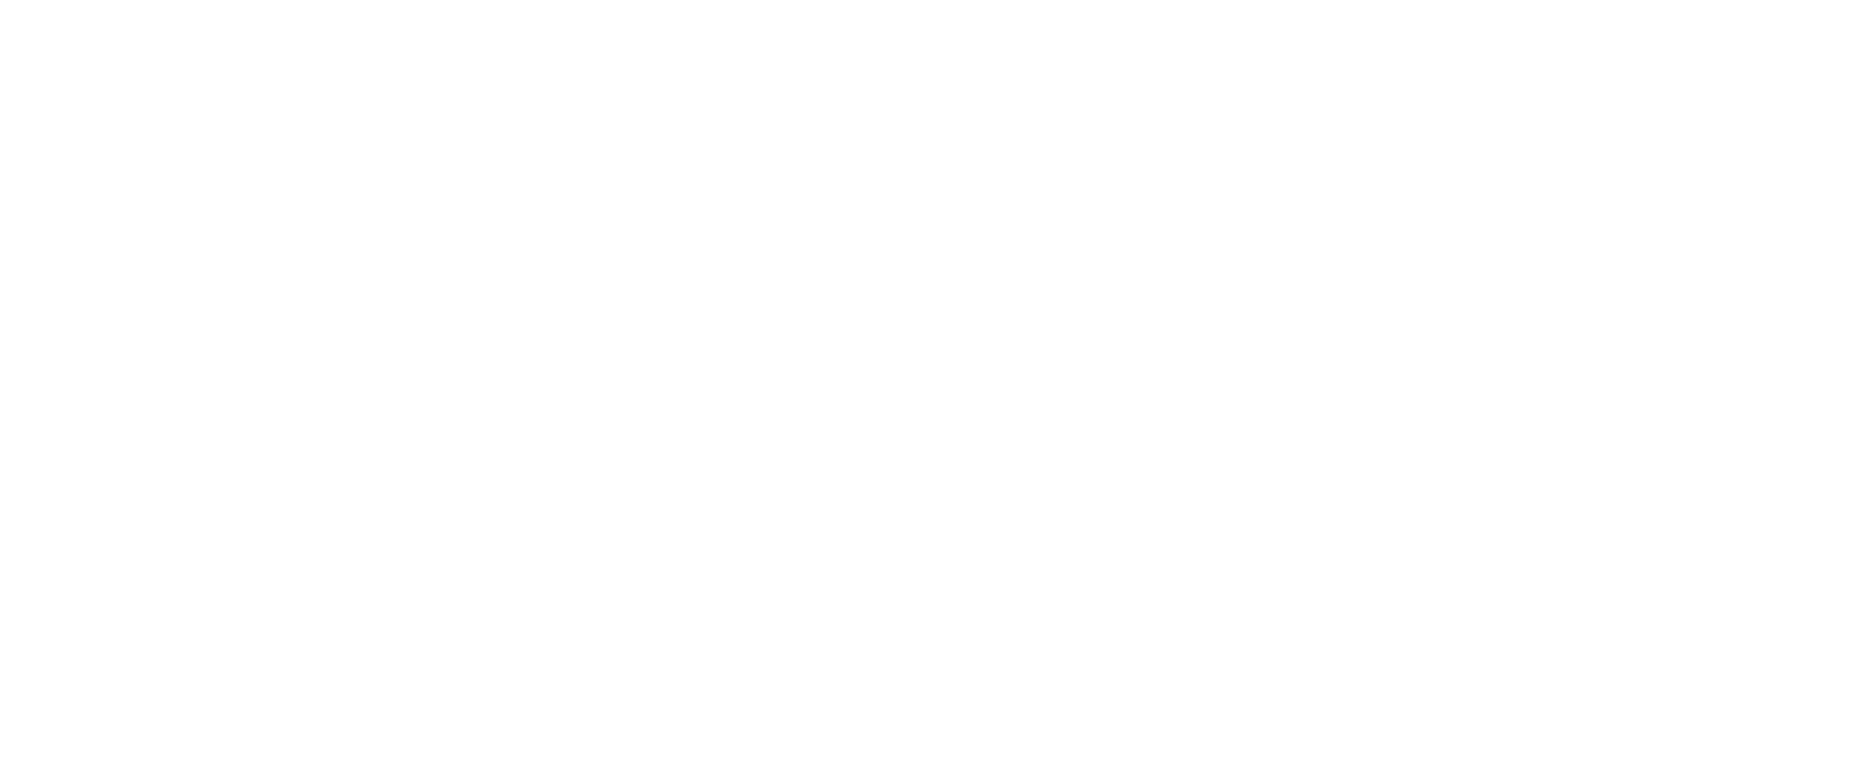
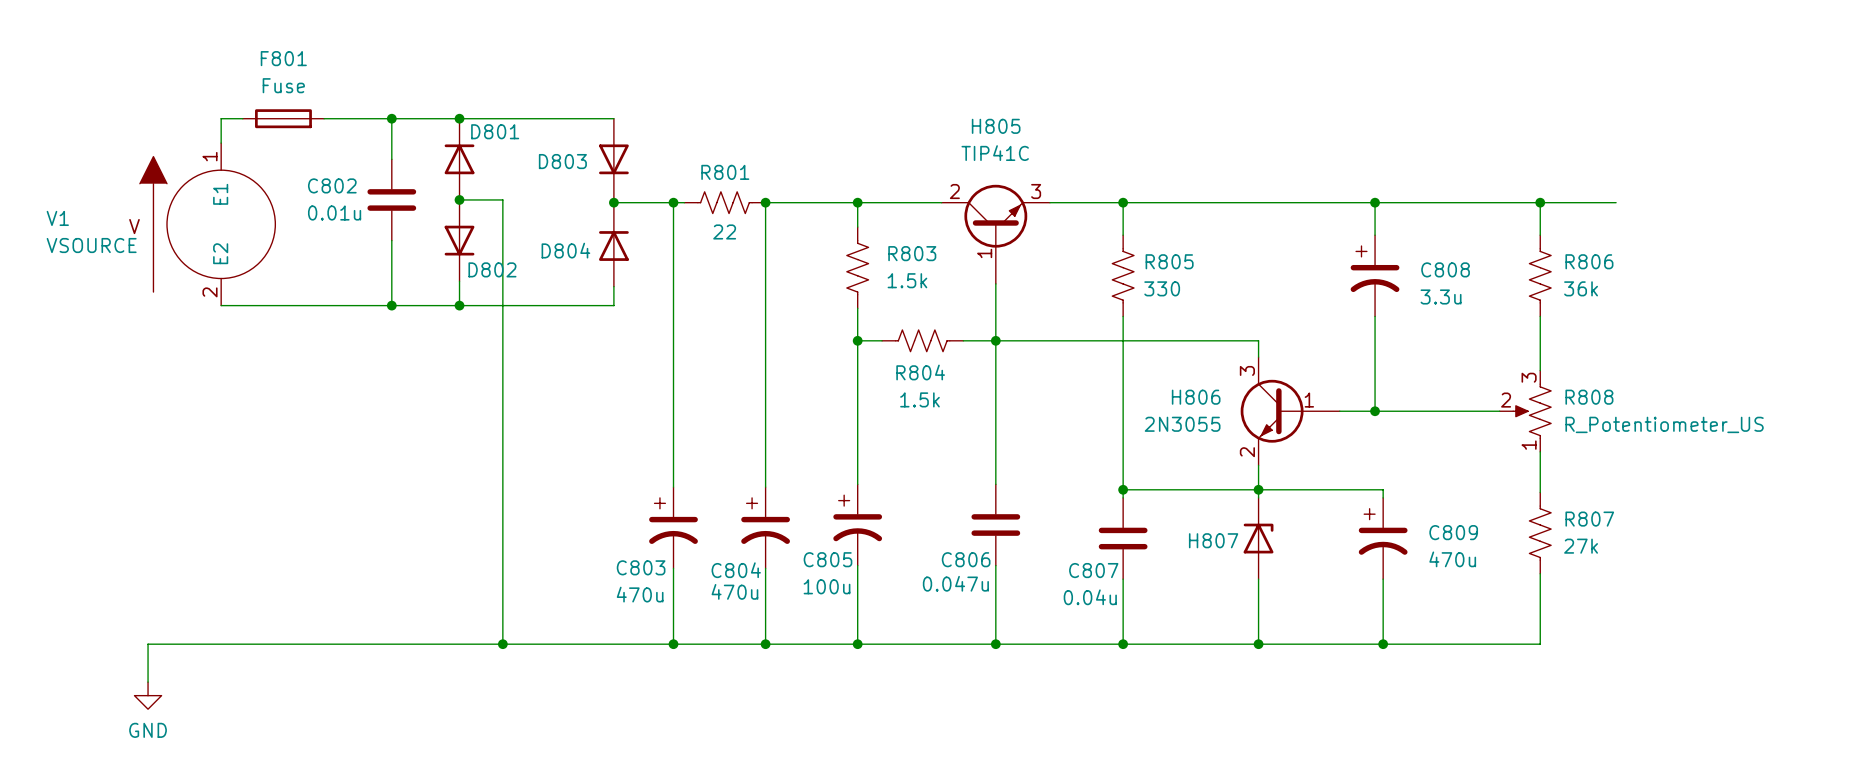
wire: none -> (242, 118) (221, 118) (221, 143)
F801: none -> Fuse (283, 118)
wire: none -> (324, 118) (613, 118)
wire: none -> (391, 118) (391, 159)
junction: none -> (391, 118)
junction: none -> (459, 118)
D801: none -> (459, 159)
D803: none -> (613, 159)
C802: none -> 0.01u (391, 199)
wire: none -> (459, 199) (502, 199) (502, 644)
junction: none -> (459, 199)
wire: none -> (613, 202) (684, 202)
junction: none -> (613, 202)
wire: none -> (673, 202) (673, 487)
junction: none -> (673, 202)
R801: none -> 22 (724, 202)
junction: none -> (765, 202)
wire: none -> (857, 202) (857, 227)
junction: none -> (857, 202)
wire: none -> (941, 202) (765, 202) (765, 487)
wire: none -> (1050, 202) (1616, 202)
wire: none -> (1123, 202) (1123, 235)
junction: none -> (1123, 202)
wire: none -> (1375, 202) (1375, 235)
junction: none -> (1375, 202)
wire: none -> (1540, 202) (1540, 235)
junction: none -> (1540, 202)
V1: none -> VSOURCE (207, 224)
H805: none -> TIP41C (995, 234)
wire: none -> (391, 240) (391, 305)
D802: none -> (459, 240)
D804: none -> (613, 246)
R803: none -> 1.5k (857, 267)
R805: none -> 330 (1123, 275)
C808: none -> 3.3u (1375, 275)
R806: none -> 36k (1540, 275)
wire: none -> (459, 281) (459, 305)
wire: none -> (995, 283) (995, 484)
wire: none -> (613, 286) (613, 305) (221, 305)
junction: none -> (391, 305)
junction: none -> (459, 305)
wire: none -> (857, 308) (857, 484)
wire: none -> (1123, 316) (1123, 497)
wire: none -> (1375, 316) (1375, 411)
wire: none -> (1540, 316) (1540, 370)
wire: none -> (857, 340) (882, 340)
junction: none -> (857, 340)
R804: none -> 1.5k (922, 340)
wire: none -> (963, 340) (1258, 340) (1258, 357)
junction: none -> (995, 340)
H806: none -> 2N3055 (1290, 411)
wire: none -> (1339, 411) (1499, 411)
junction: none -> (1375, 411)
R808: none -> R_Potentiometer_US (1525, 411)
wire: none -> (1540, 451) (1540, 492)
wire: none -> (1258, 465) (1258, 497)
wire: none -> (1123, 489) (1383, 489) (1383, 497)
junction: none -> (1123, 489)
junction: none -> (1258, 489)
C805: none -> 100u (857, 525)
C806: none -> 0.047u (995, 525)
C803: none -> 470u (673, 527)
C804: none -> 470u (765, 527)
R807: none -> 27k (1540, 533)
C807: none -> 0.04u (1123, 538)
H807: none -> (1258, 538)
C809: none -> 470u (1383, 538)
wire: none -> (857, 565) (857, 644)
wire: none -> (995, 565) (995, 644)
wire: none -> (673, 568) (673, 644)
wire: none -> (765, 568) (765, 644)
wire: none -> (1540, 573) (1540, 644) (148, 644) (148, 682)
wire: none -> (1123, 579) (1123, 644)
wire: none -> (1258, 579) (1258, 644)
wire: none -> (1383, 579) (1383, 644)
junction: none -> (502, 644)
junction: none -> (673, 644)
junction: none -> (765, 644)
junction: none -> (857, 644)
junction: none -> (995, 644)
junction: none -> (1123, 644)
junction: none -> (1258, 644)
junction: none -> (1383, 644)
power symbol: none -> GND (148, 695)

